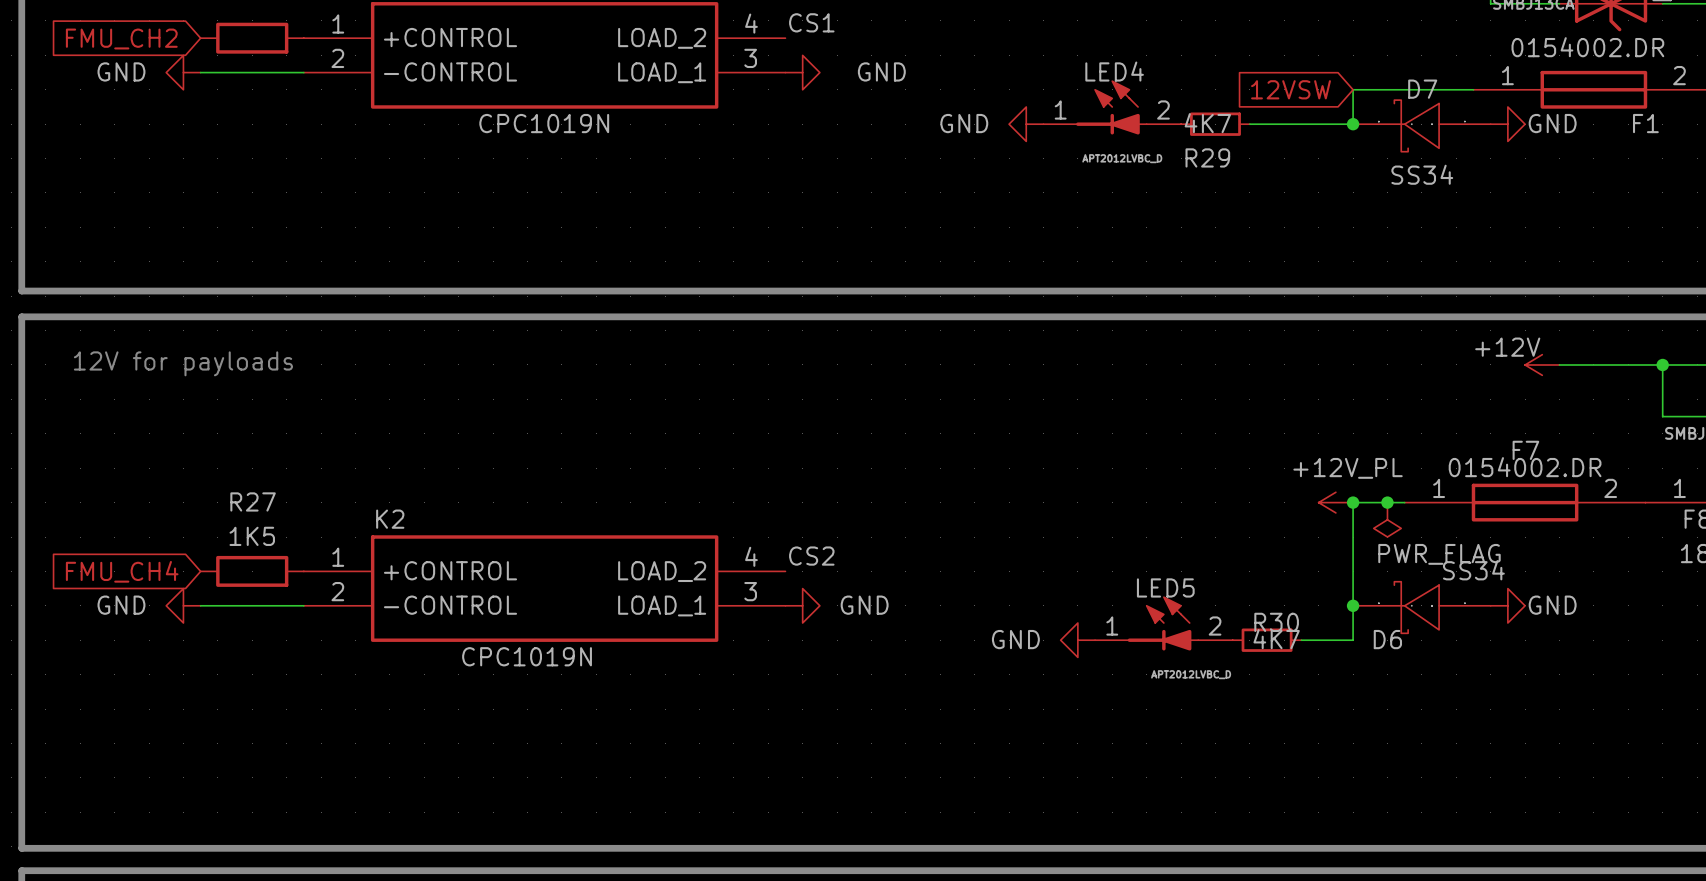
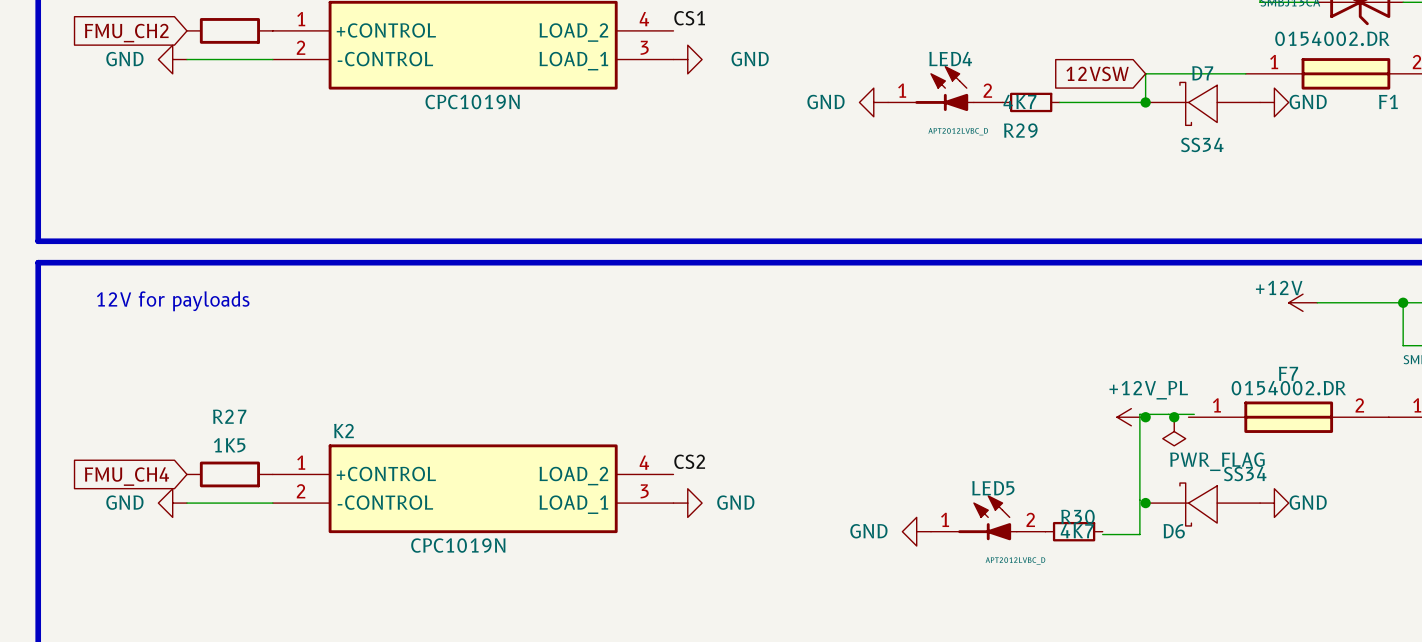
wire: none -> (1194, 414) (1139, 414) (1139, 534) (1102, 534)
wire: (1404, 502) (1353, 502) (1353, 640) (1301, 640) -> none

